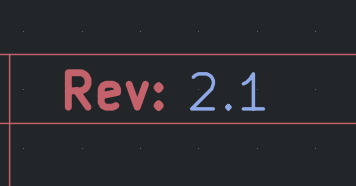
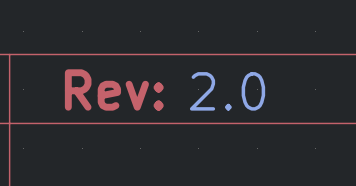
text: 2.1 (227, 91) -> 2.0 (227, 91)

